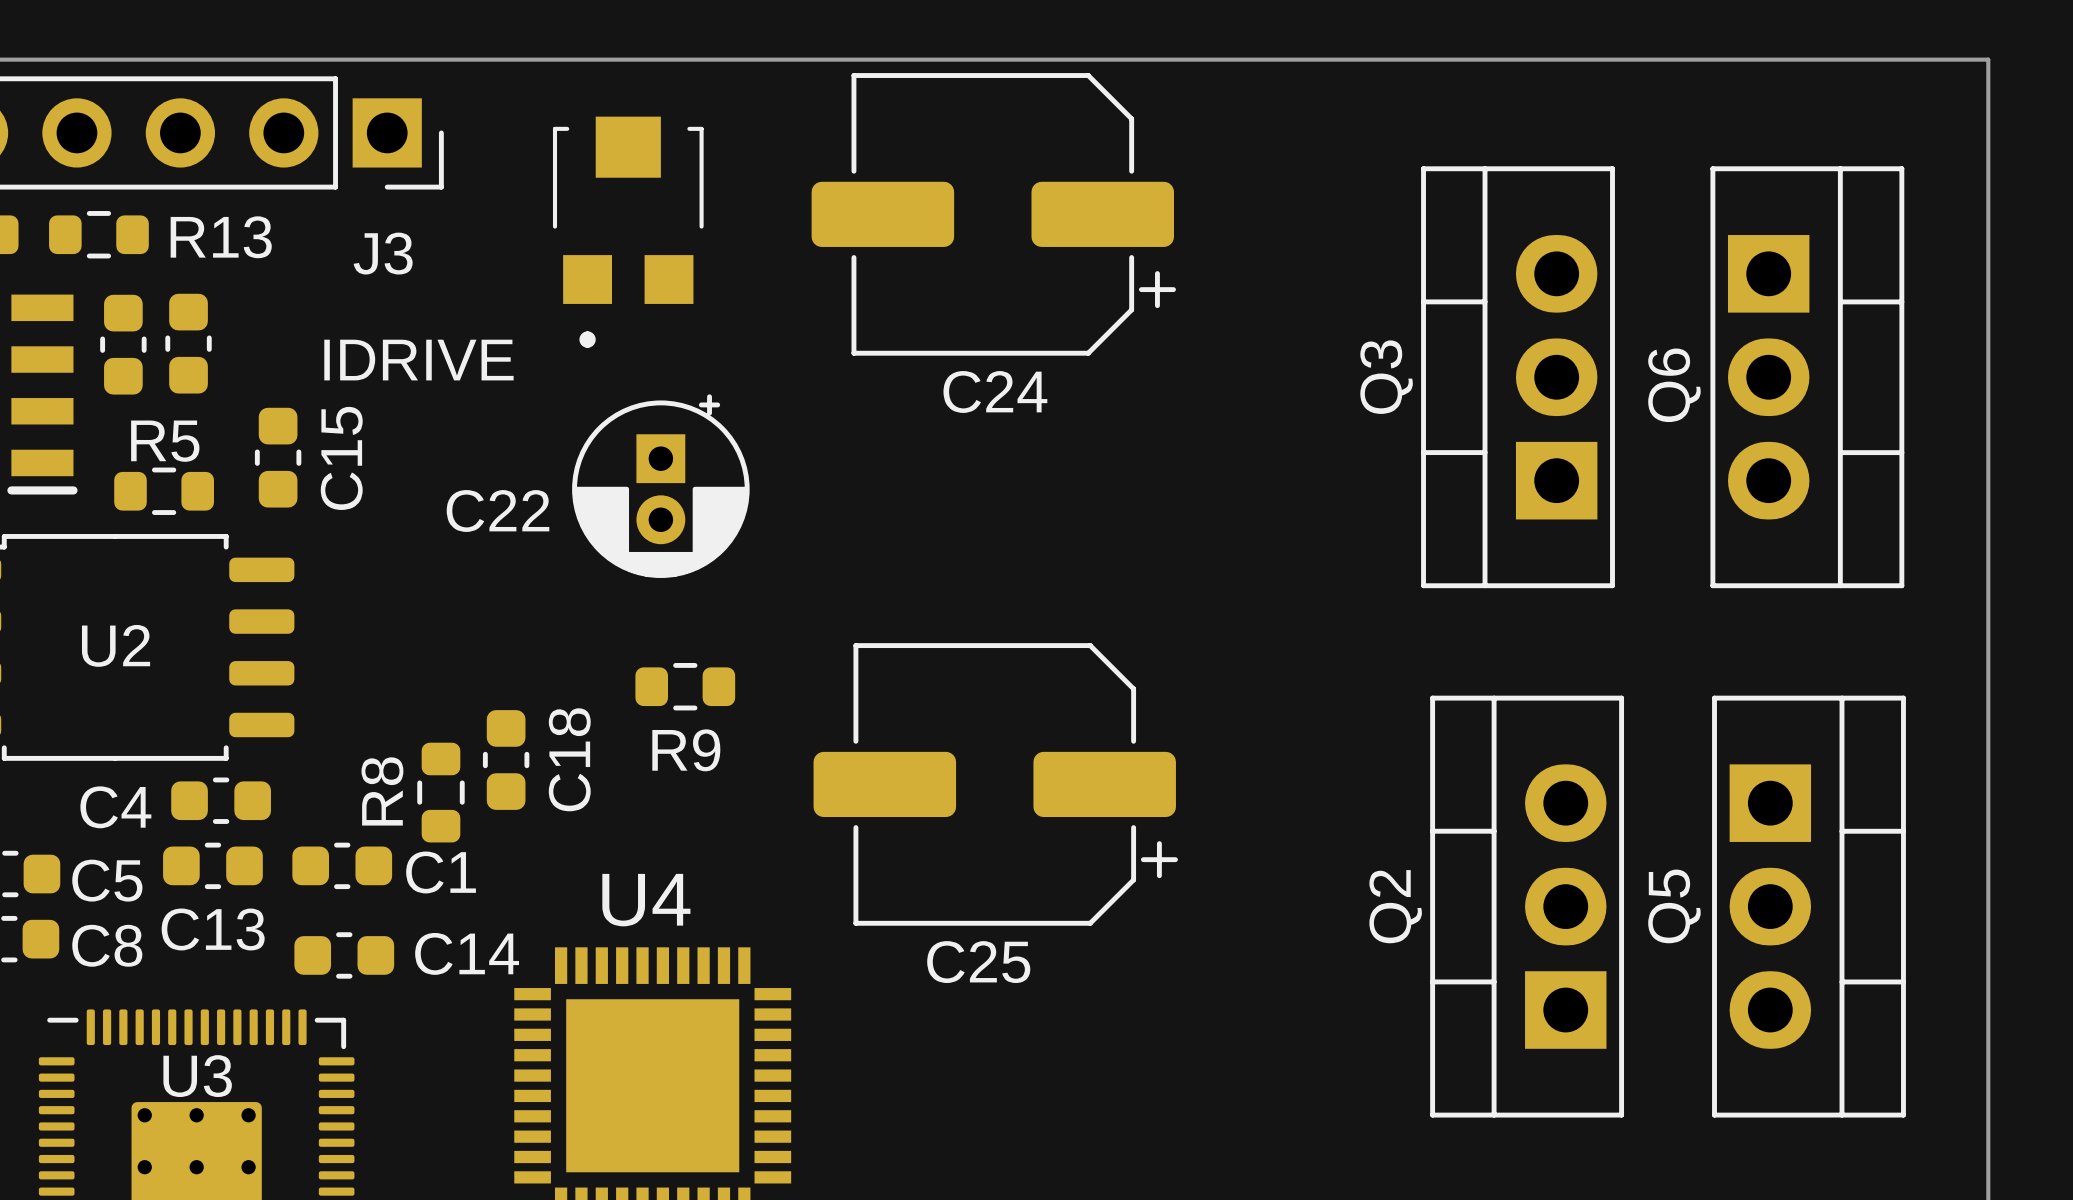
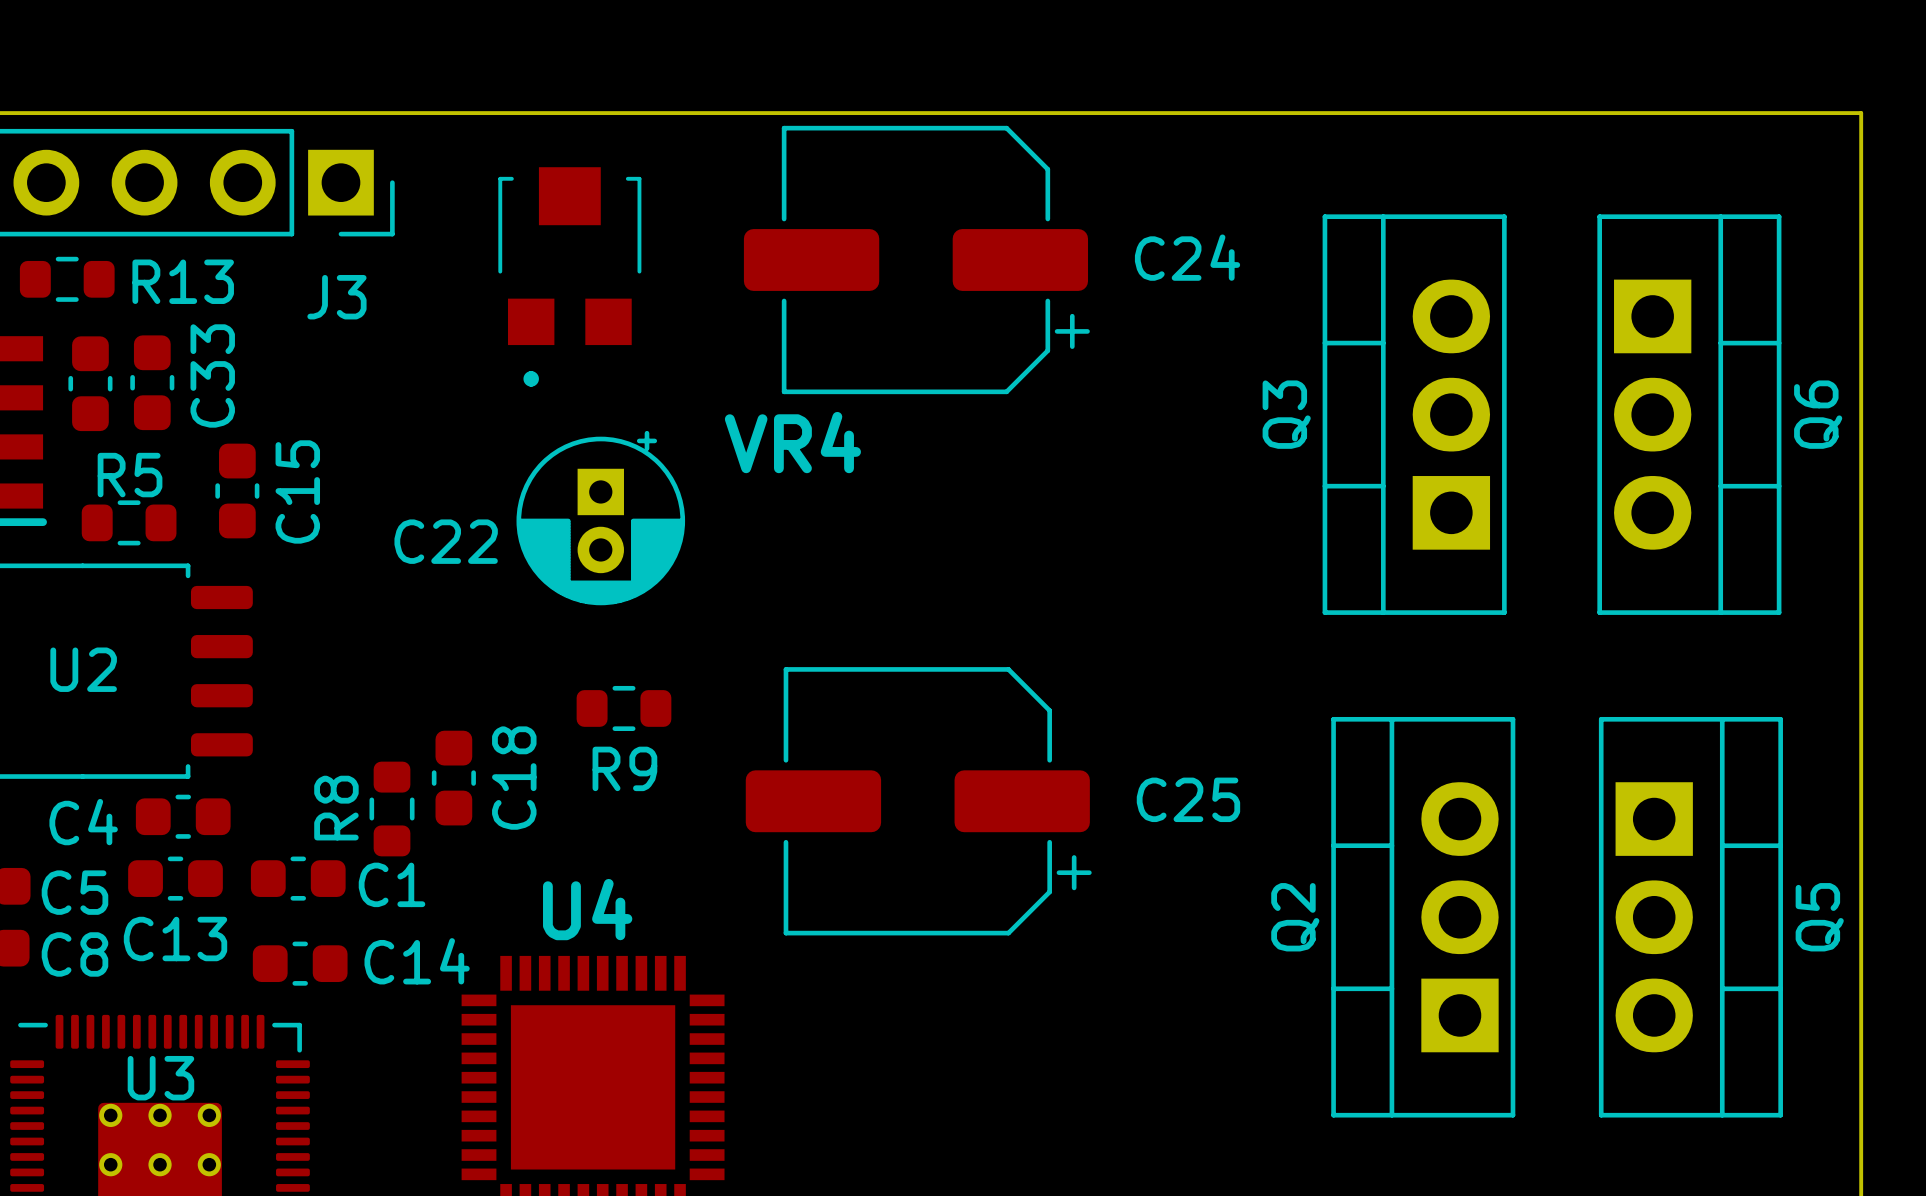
C33 name: none -> C33 (212, 375)
text: IDRIVE (418, 360) -> none
Q6 name position: Q6 (1674, 385) -> Q6 (1818, 414)
C24 name position: C24 (995, 392) -> C24 (1187, 257)
VR4 name: none -> VR4 (792, 442)
Q5 name position: Q5 (1674, 906) -> Q5 (1819, 917)
C25 name position: C25 (978, 962) -> C25 (1188, 799)

